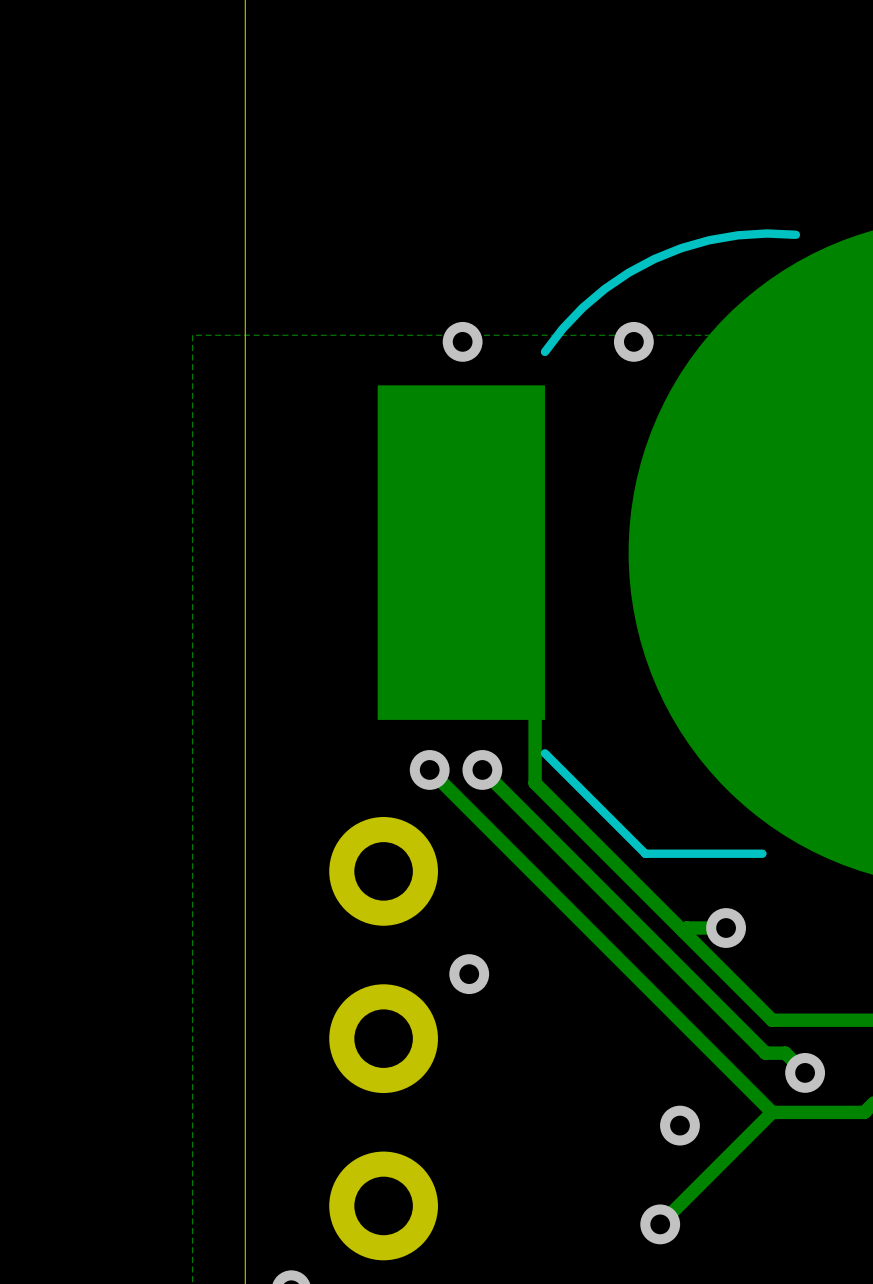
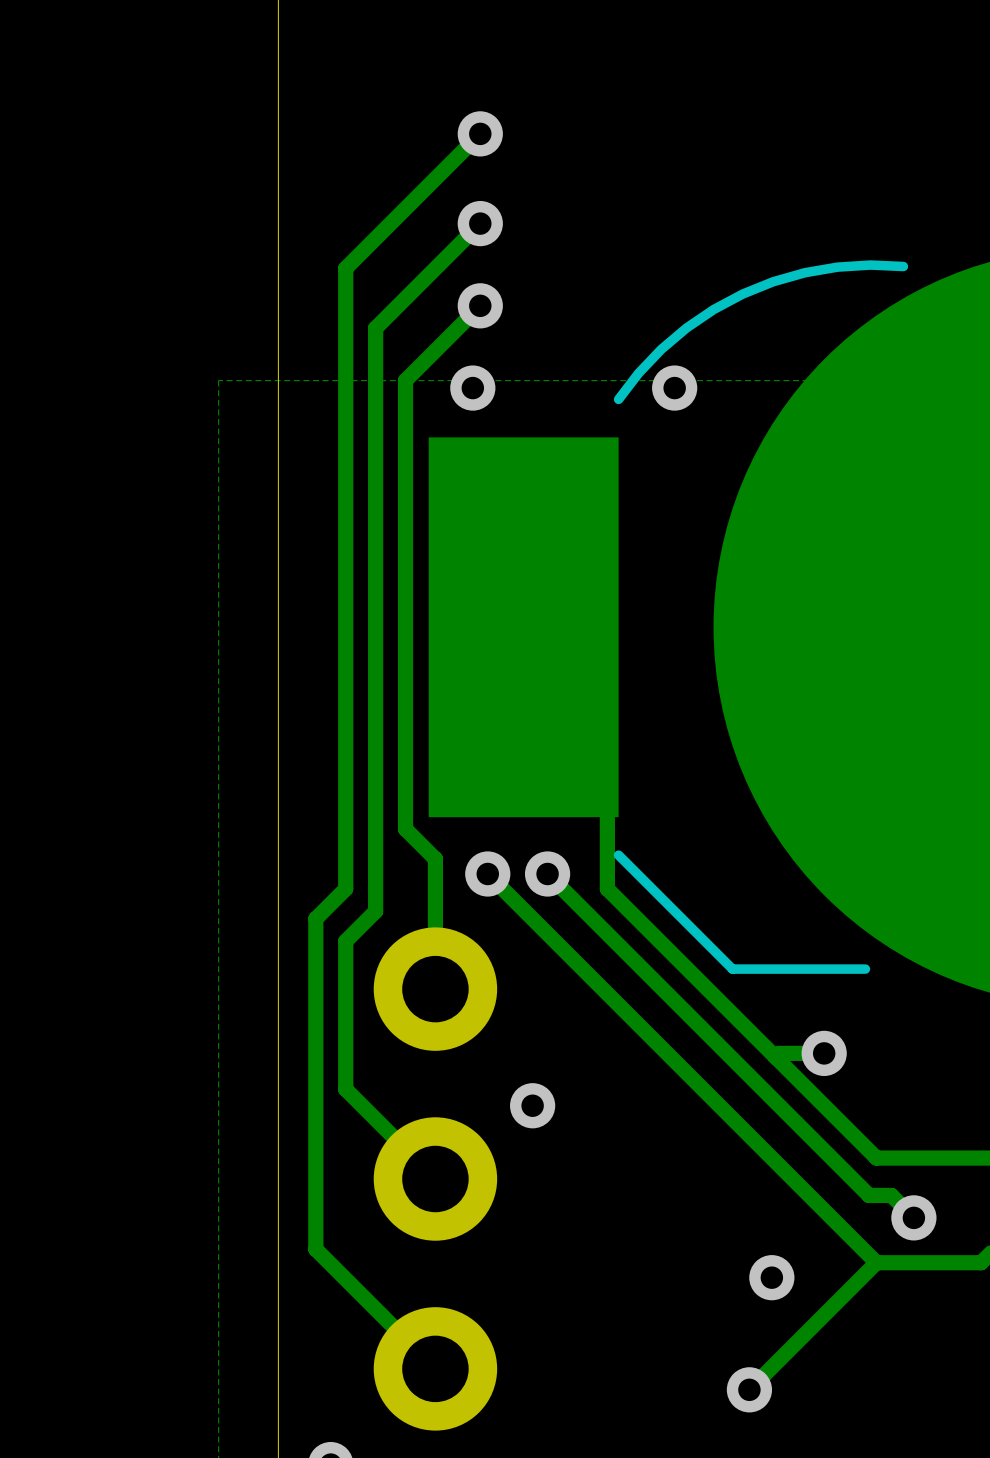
track: none -> (480, 133) (345, 268) (345, 888) (315, 918) (315, 1249) (435, 1368)
via: none -> (480, 133)
track: none -> (480, 223) (375, 328) (375, 911) (345, 941) (345, 1089) (435, 1179)
via: none -> (480, 223)
track: none -> (480, 305) (405, 380) (405, 829) (435, 859) (435, 989)
via: none -> (480, 305)
via: none -> (472, 388)
via: (462, 341) -> none
via position: (633, 341) -> (674, 388)

